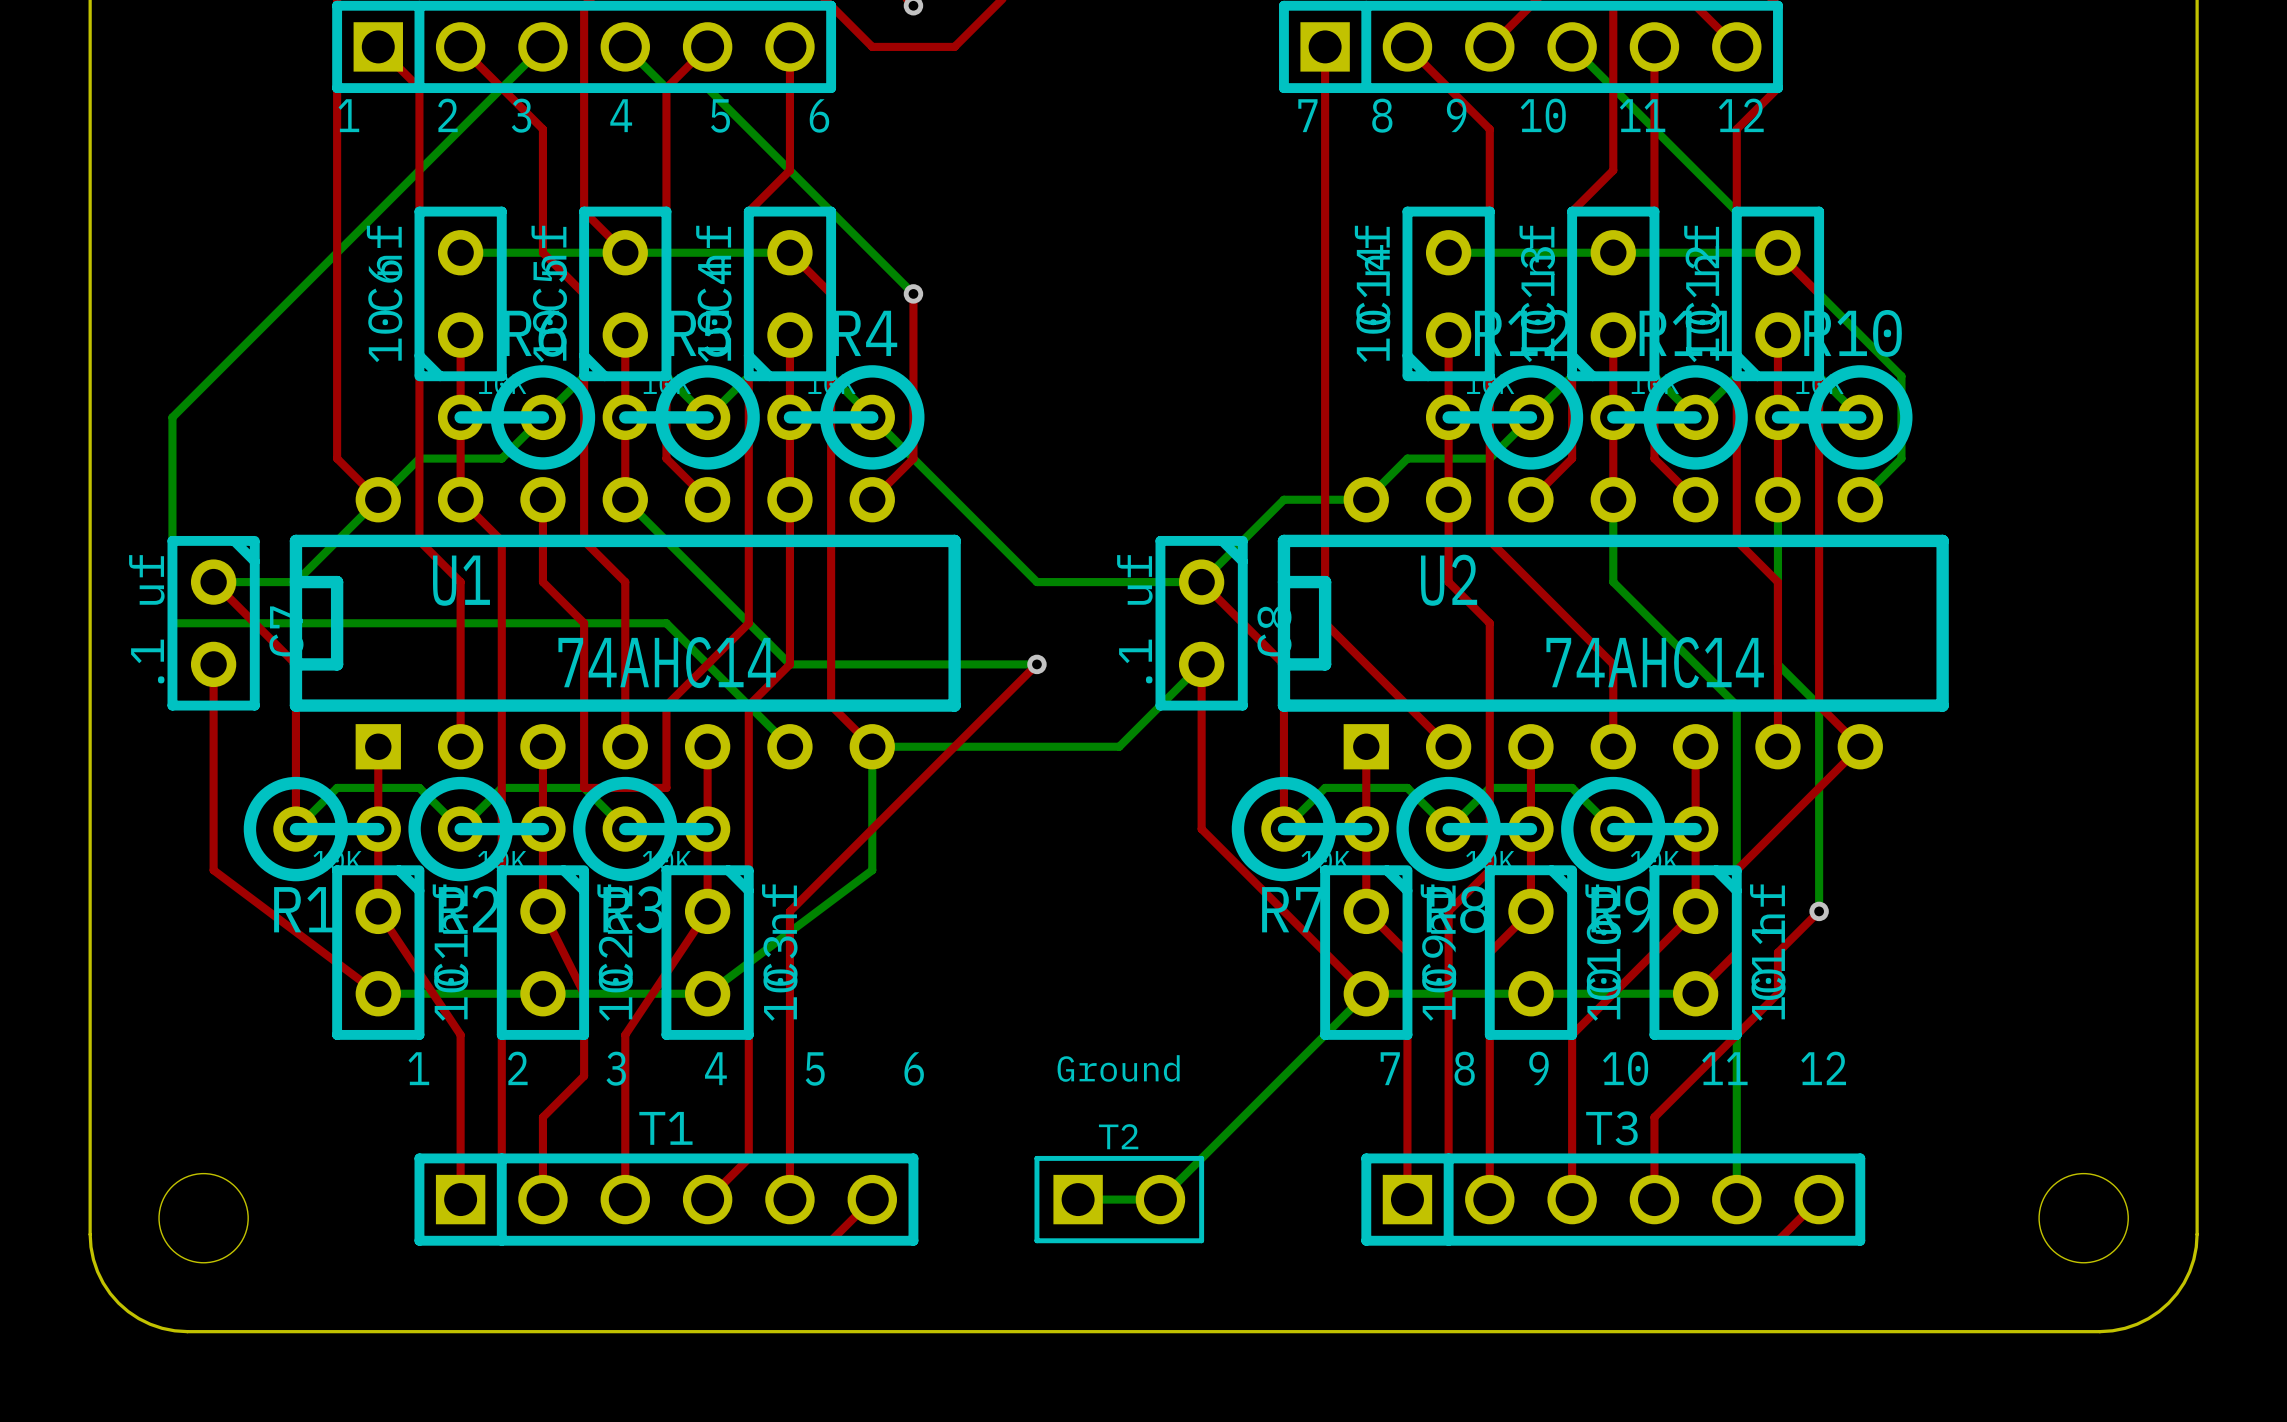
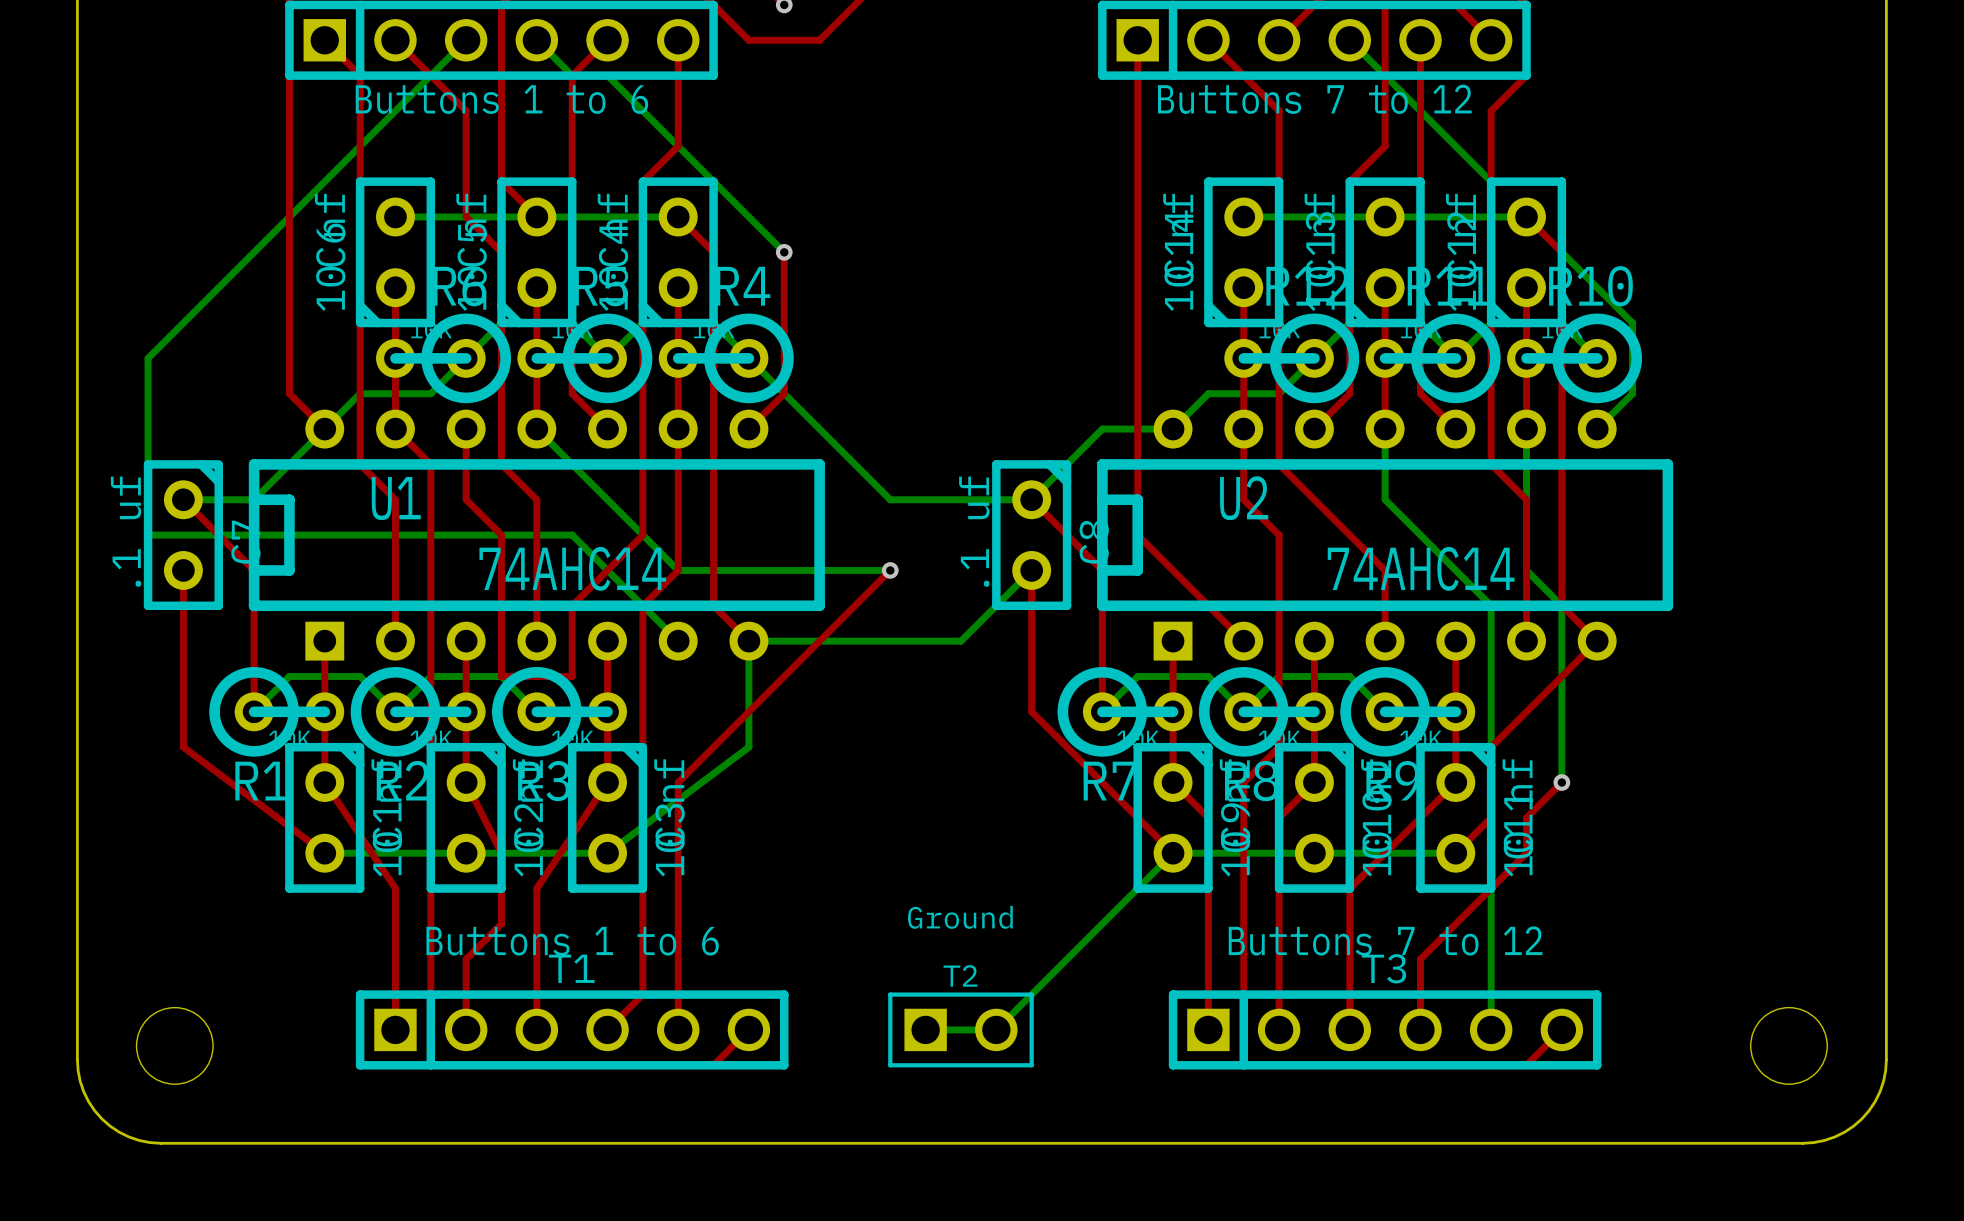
part value: 1 2 3 4 5 6 (583, 115) -> Buttons 1 to 6 (501, 99)
part value: 7 8 9 10 11 12 (1531, 115) -> Buttons 7 to 12 (1314, 99)
T1 value: 1 2 3 4 5 6 (666, 1068) -> Buttons 1 to 6 (572, 941)
T3 value: 7 8 9 10 11 12 (1613, 1068) -> Buttons 7 to 12 (1385, 940)

